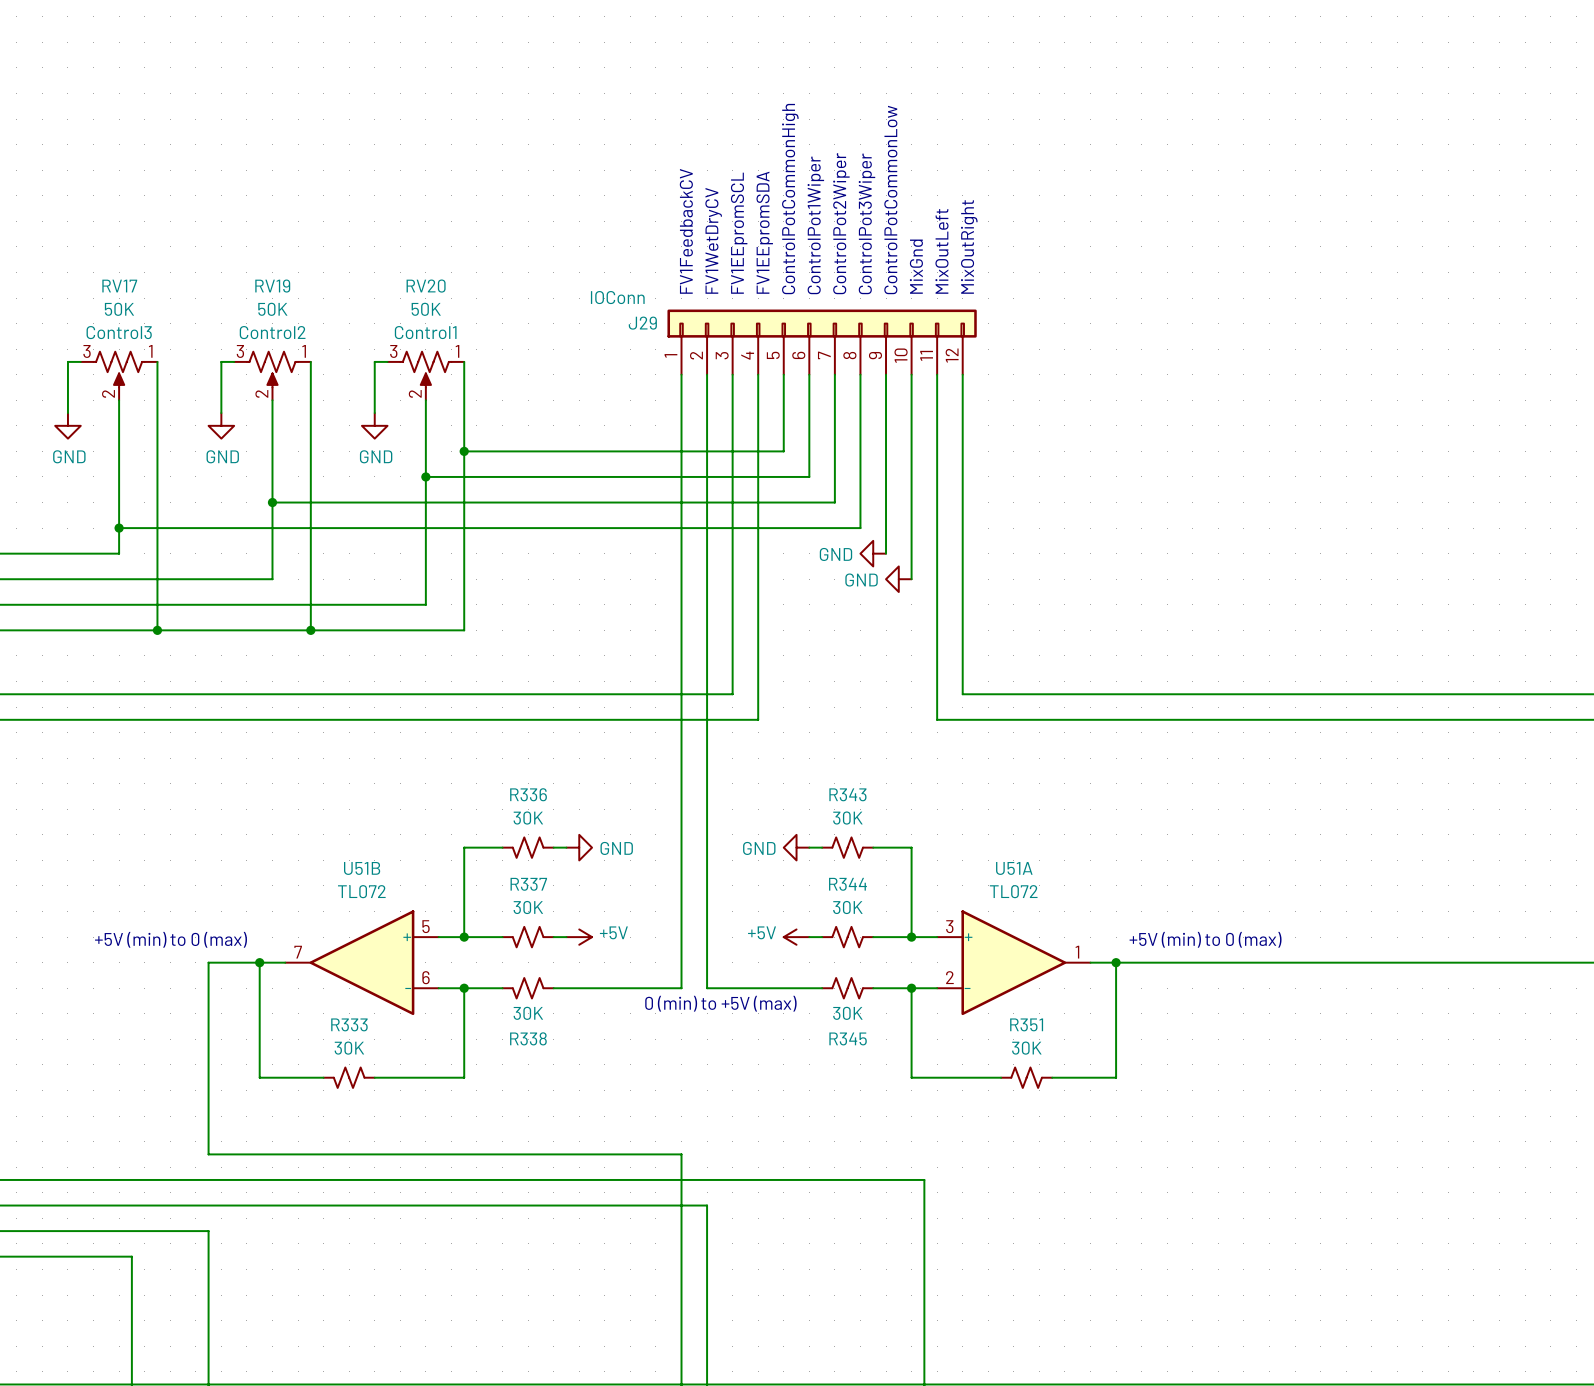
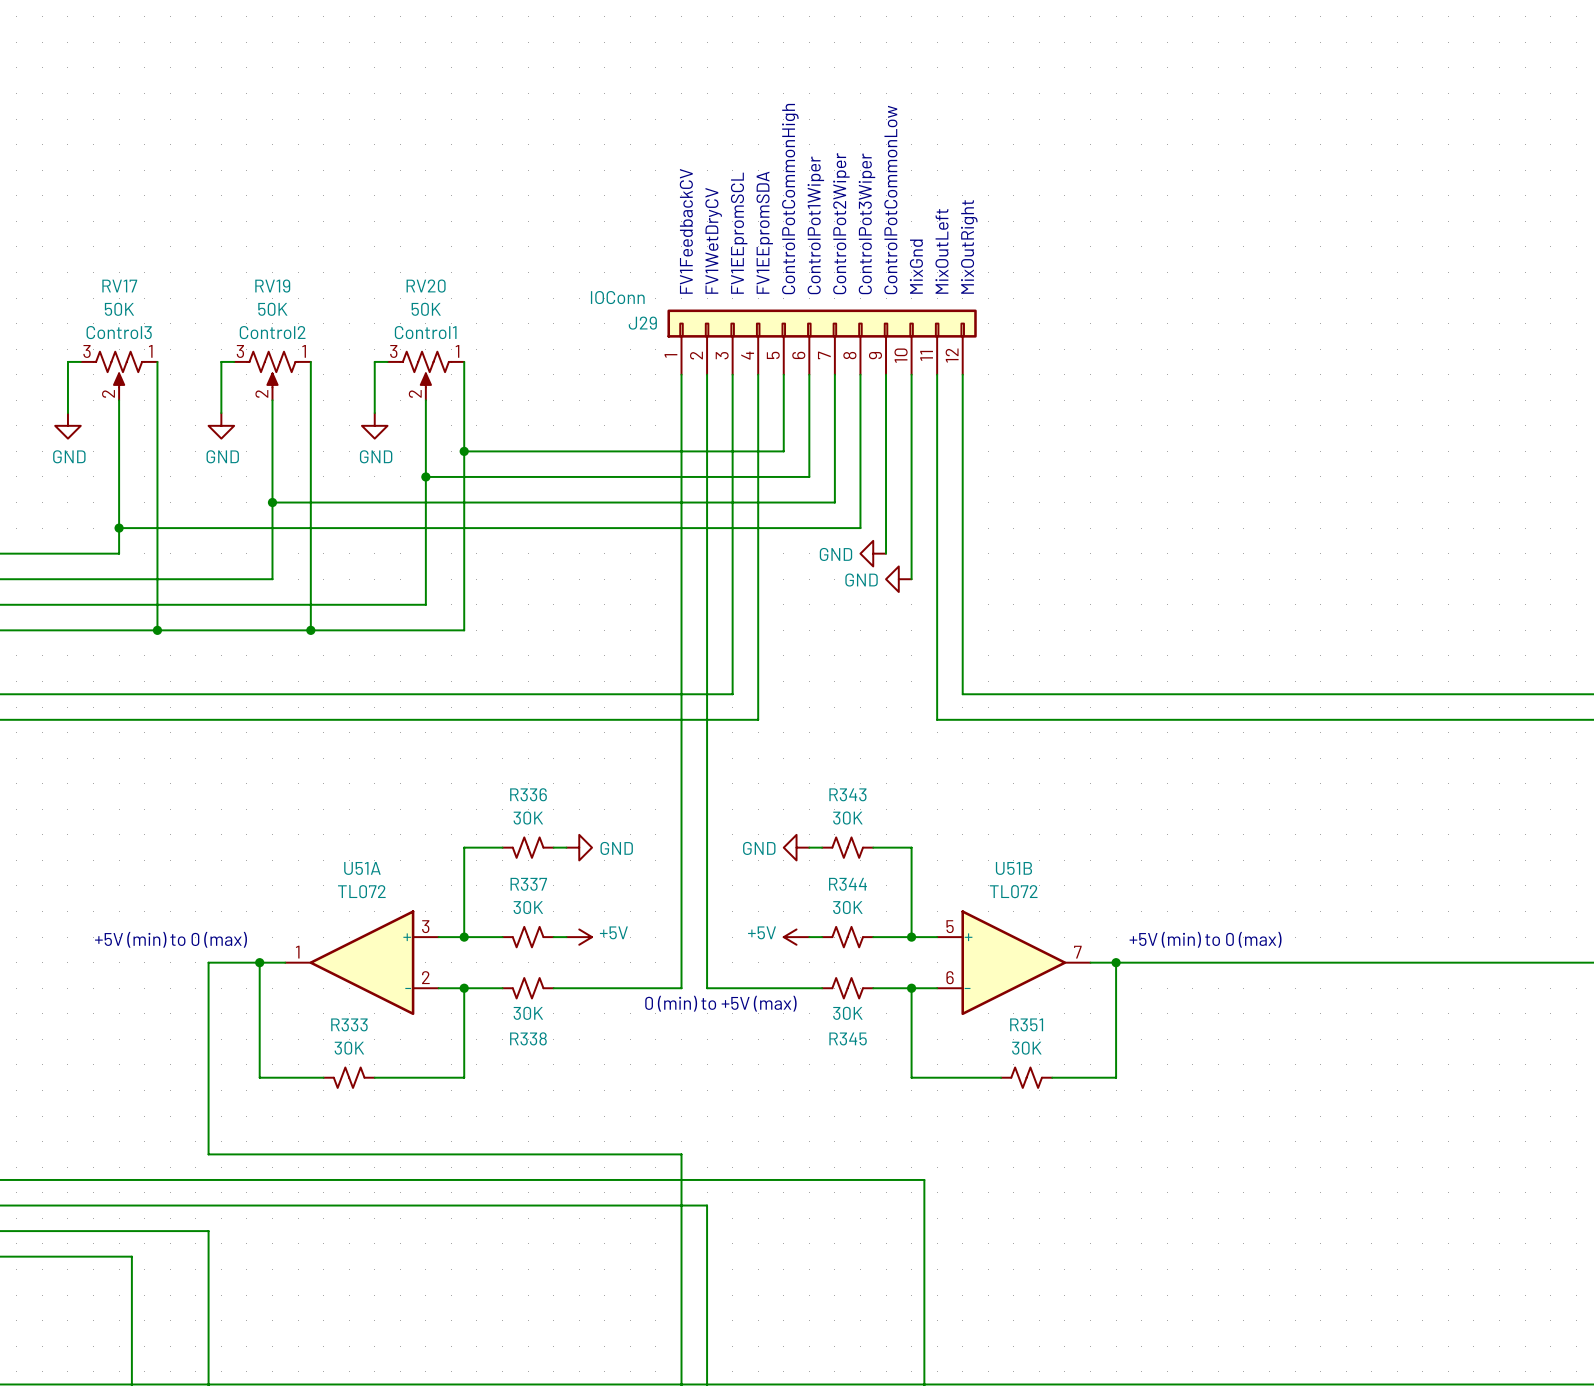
U51B flip: as is (361, 962) -> left-right (1013, 962)
U51B position: (361, 962) -> (1013, 962)
U51A flip: as is (1013, 962) -> left-right (361, 962)
U51A position: (1013, 962) -> (361, 962)

